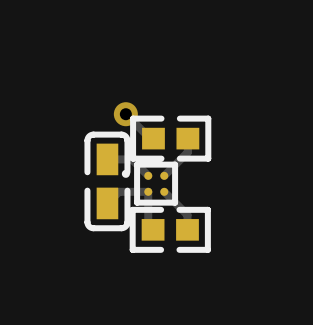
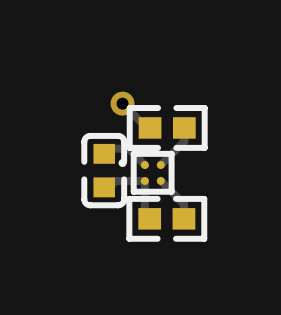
part footprint: [84, 131, 131, 232] -> [81, 132, 128, 209]

